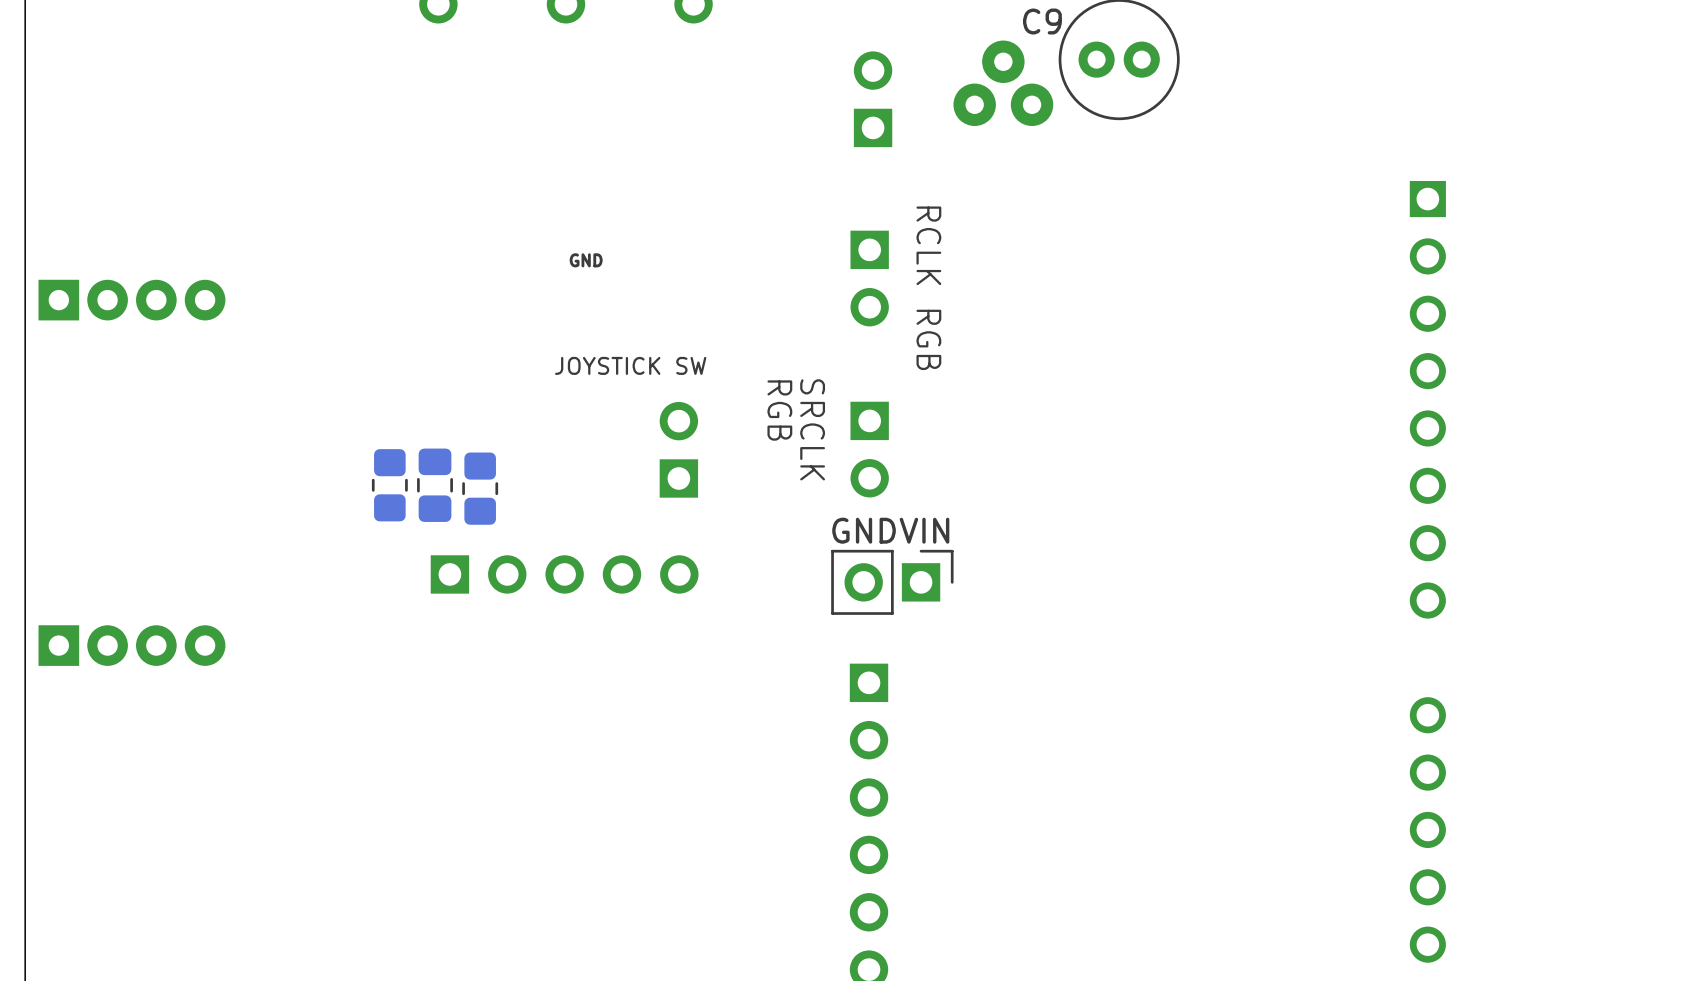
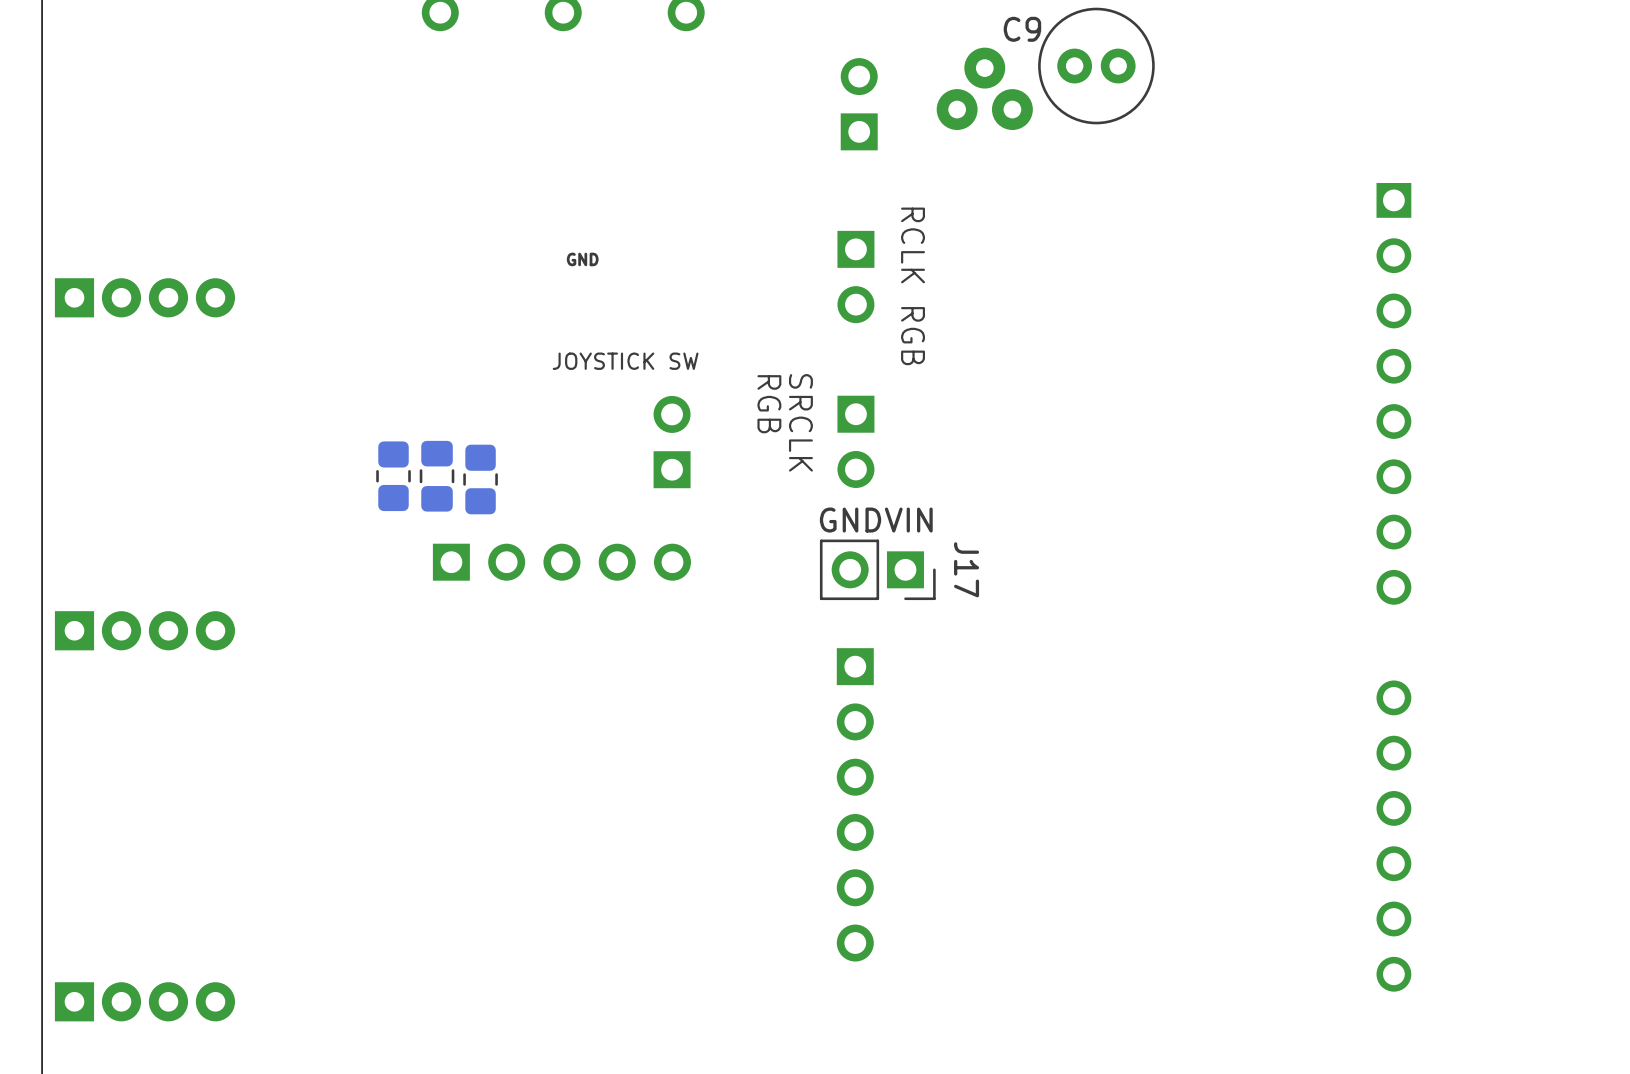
part: (892, 582) -> none
J17: none -> (877, 569)

